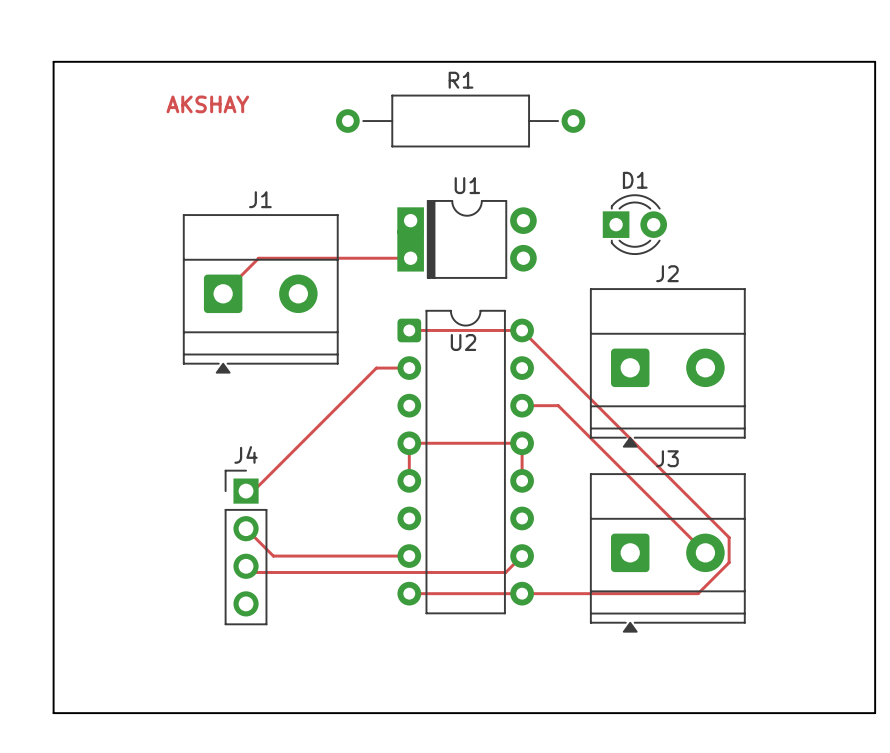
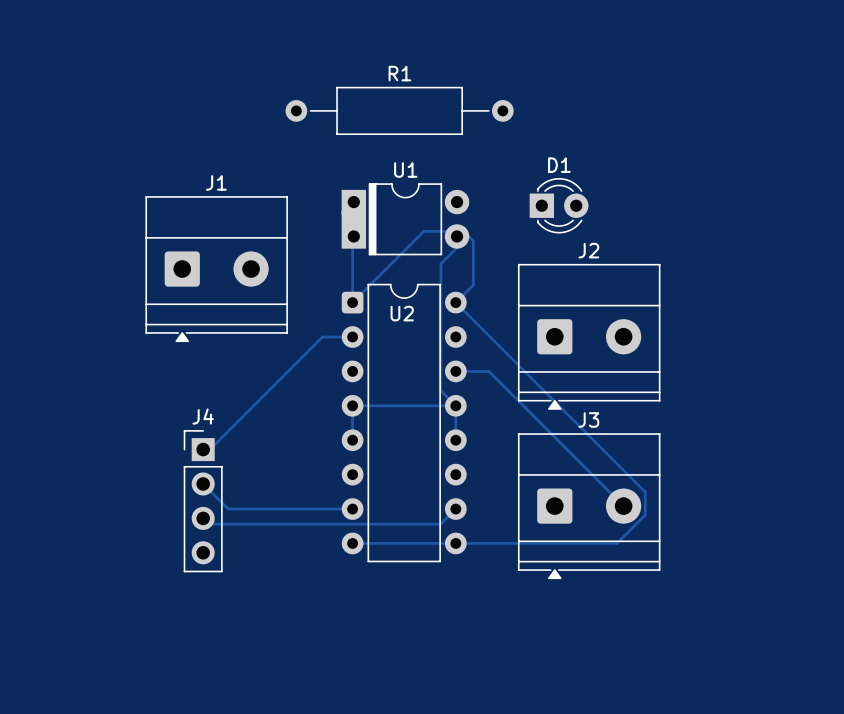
board edge: (53, 61) (875, 61) (875, 713) (53, 713) (53, 61) -> none
text: AKSHAY (207, 104) -> none
track: (410, 258) (258, 258) (223, 293) -> none
track: none -> (457, 247) (440, 263) (440, 390) (455, 405)
track: (409, 330) (522, 330) -> (353, 213) (352, 302) (423, 231) (463, 231) (473, 240) (473, 285) (455, 302)

